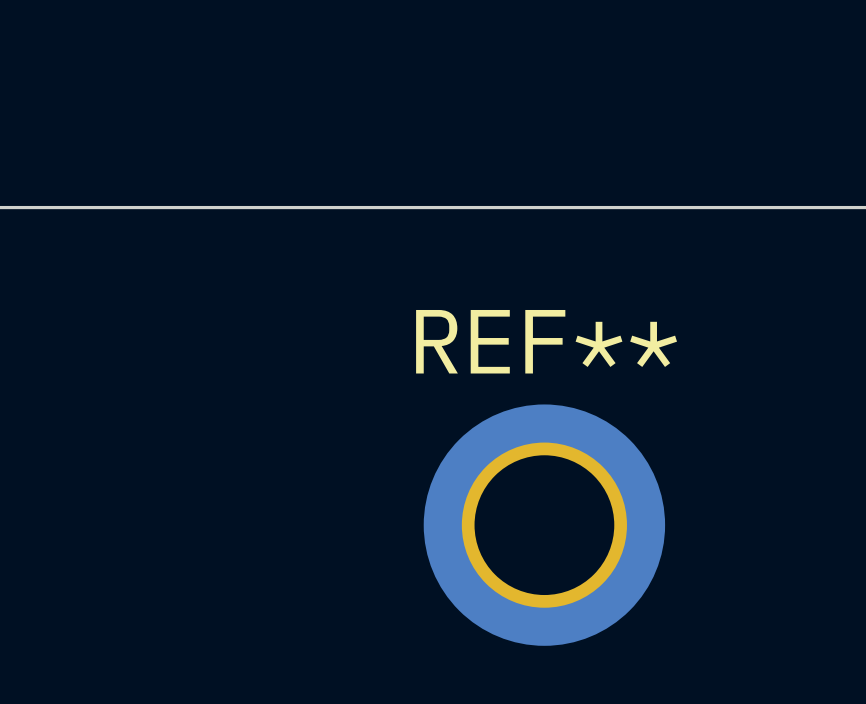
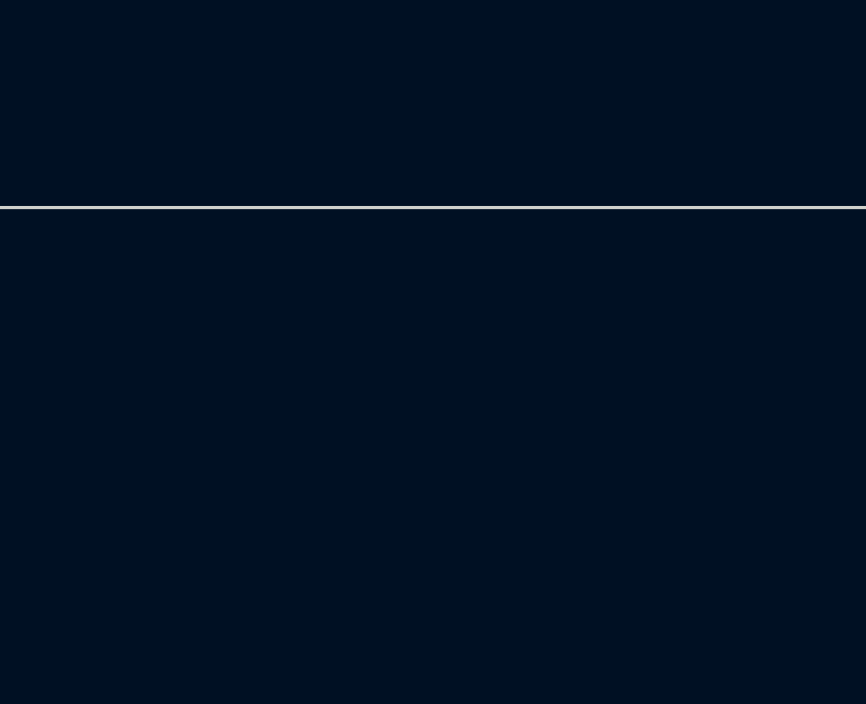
REF**: (544, 525) -> none

